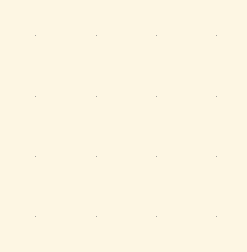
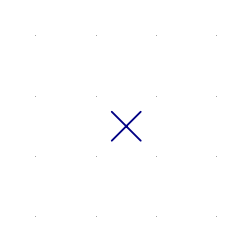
no-connect mark: none -> (126, 126)

